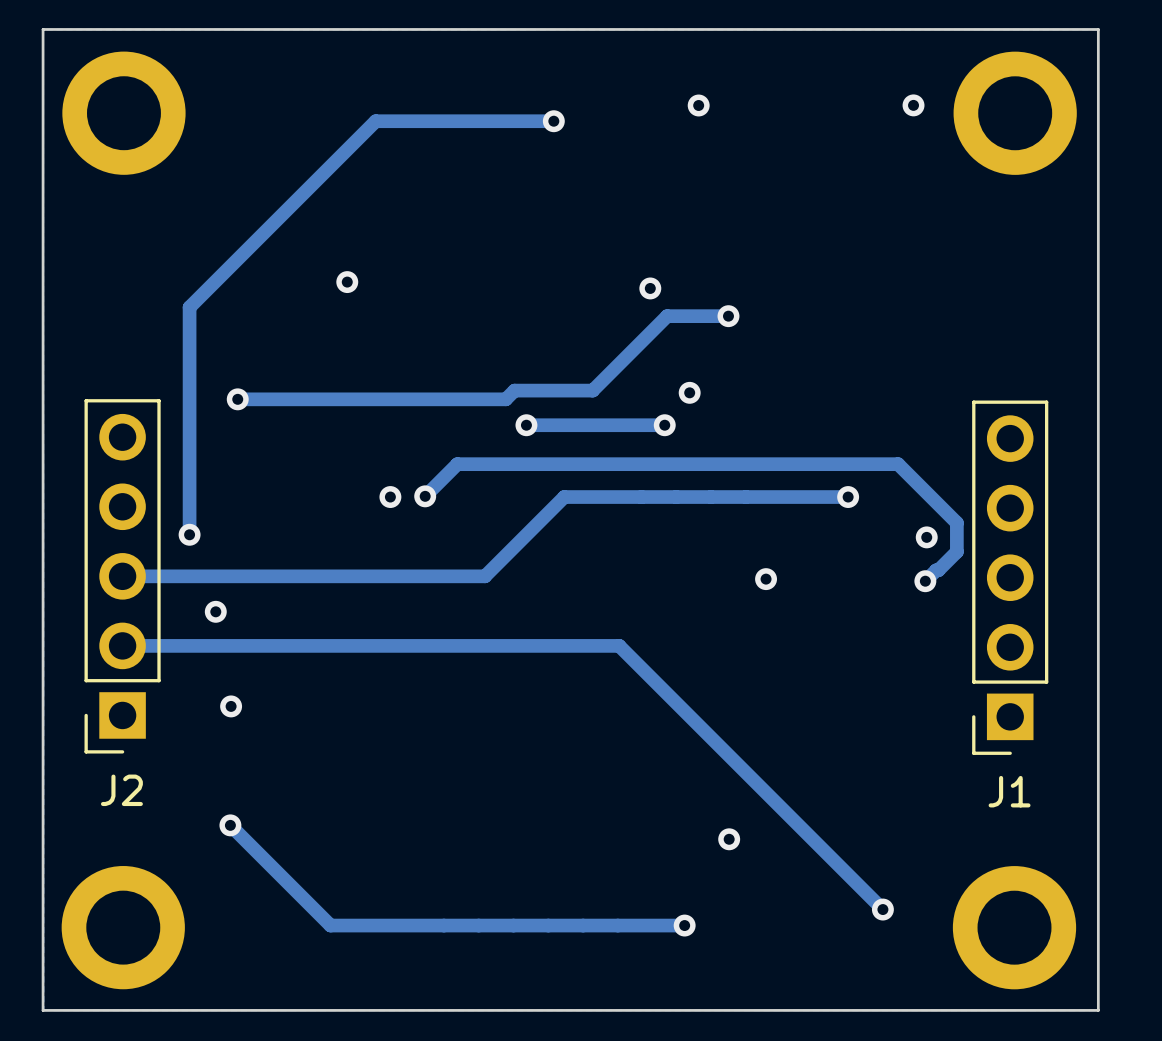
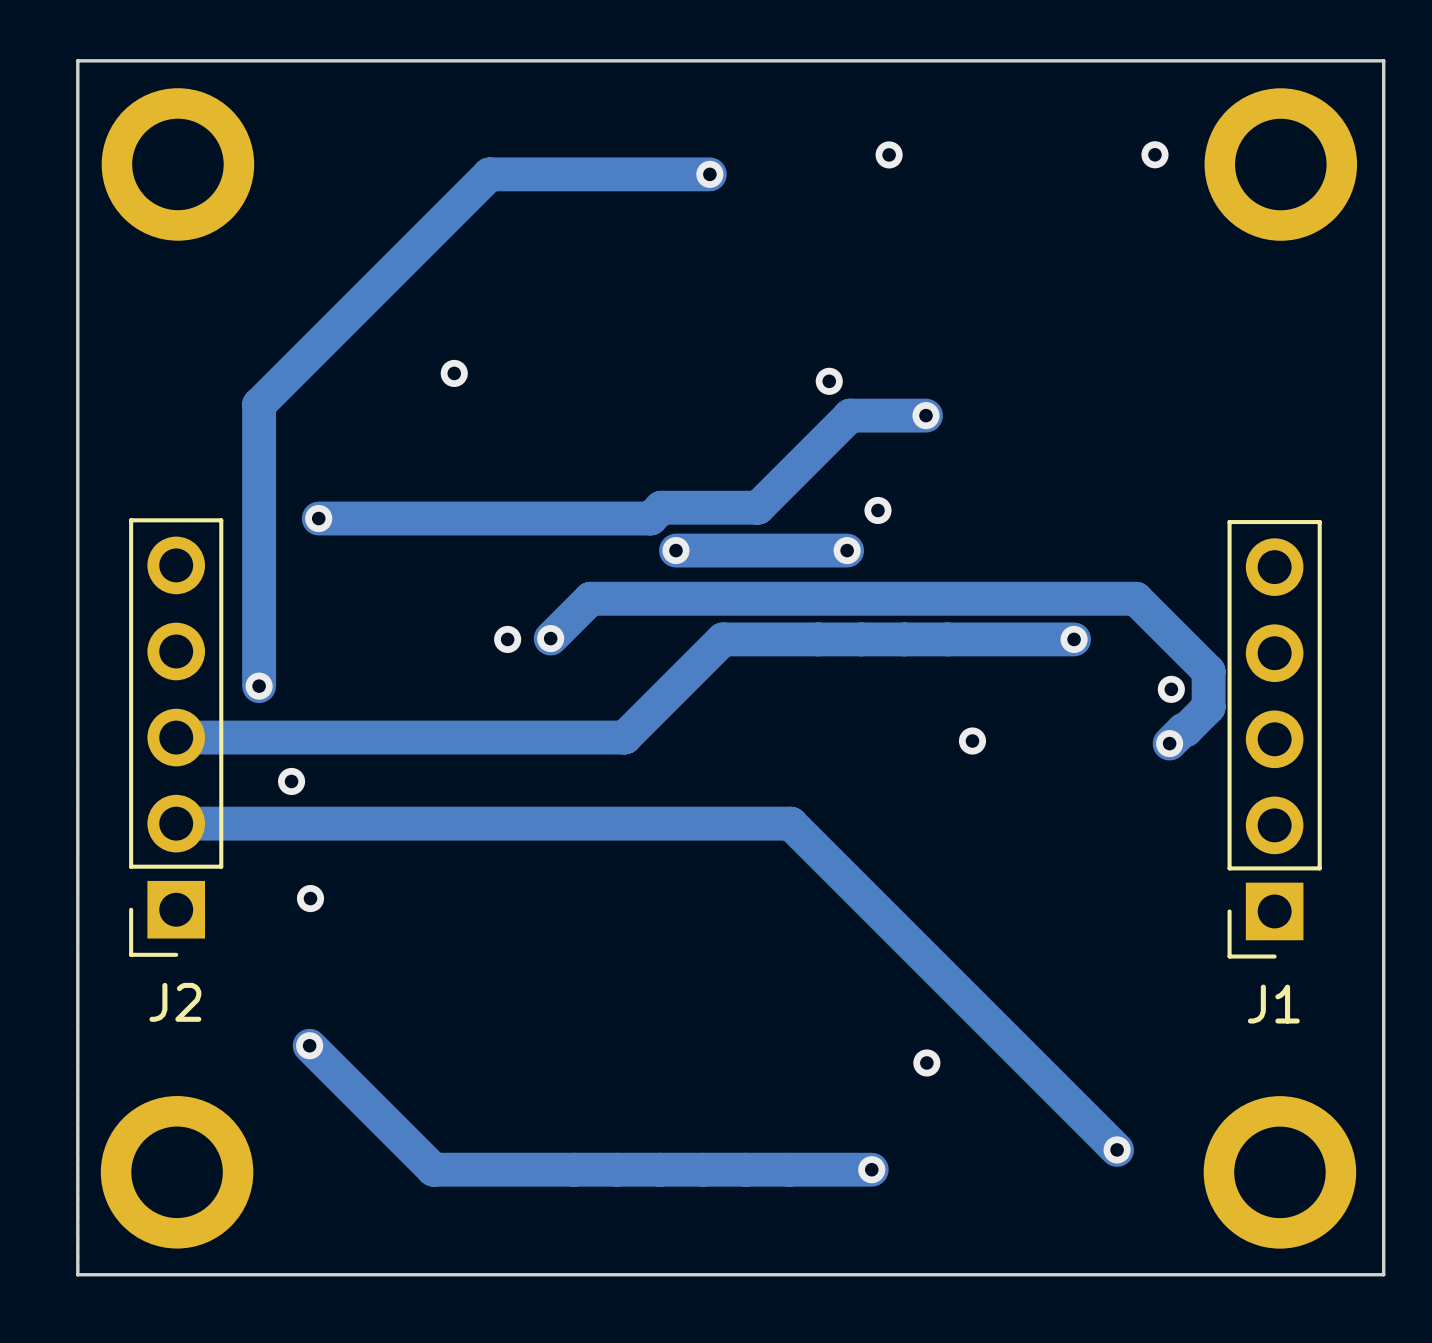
track width: thin (553, 121) (375, 121) (189, 307) (189, 534) -> thick (709, 174) (489, 174) (259, 404) (259, 686)
track width: thin (728, 316) (667, 316) (592, 390) (514, 390) (505, 399) (237, 399) -> thick (926, 415) (850, 415) (758, 507) (661, 507) (650, 518) (318, 518)
track width: thin (664, 425) (526, 425) -> thick (847, 550) (675, 550)
track width: thin (425, 496) (457, 464) (898, 464) (956, 522) (956, 551) (925, 581) -> thick (550, 638) (590, 598) (1135, 598) (1208, 671) (1208, 707) (1169, 743)
track width: thin (848, 497) (564, 497) (485, 576) (122, 576) -> thick (1074, 639) (722, 639) (624, 737) (176, 737)
track width: thin (122, 645) (619, 645) (882, 909) -> thick (176, 823) (790, 823) (1117, 1149)
track width: thin (230, 825) (330, 925) (684, 925) -> thick (309, 1045) (433, 1169) (871, 1169)

